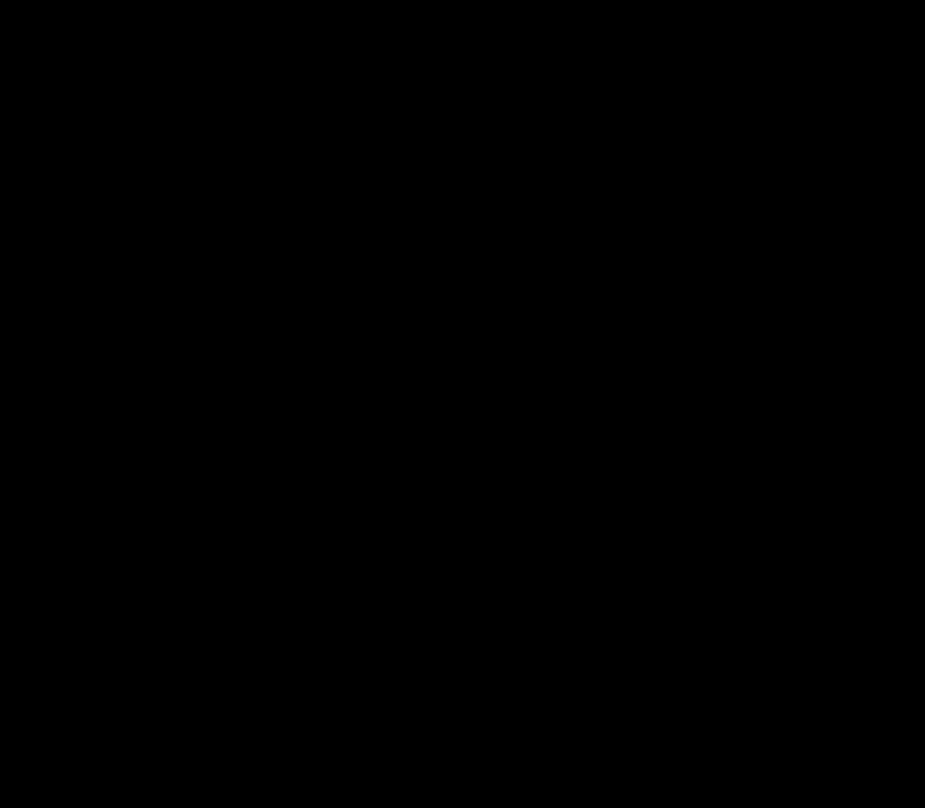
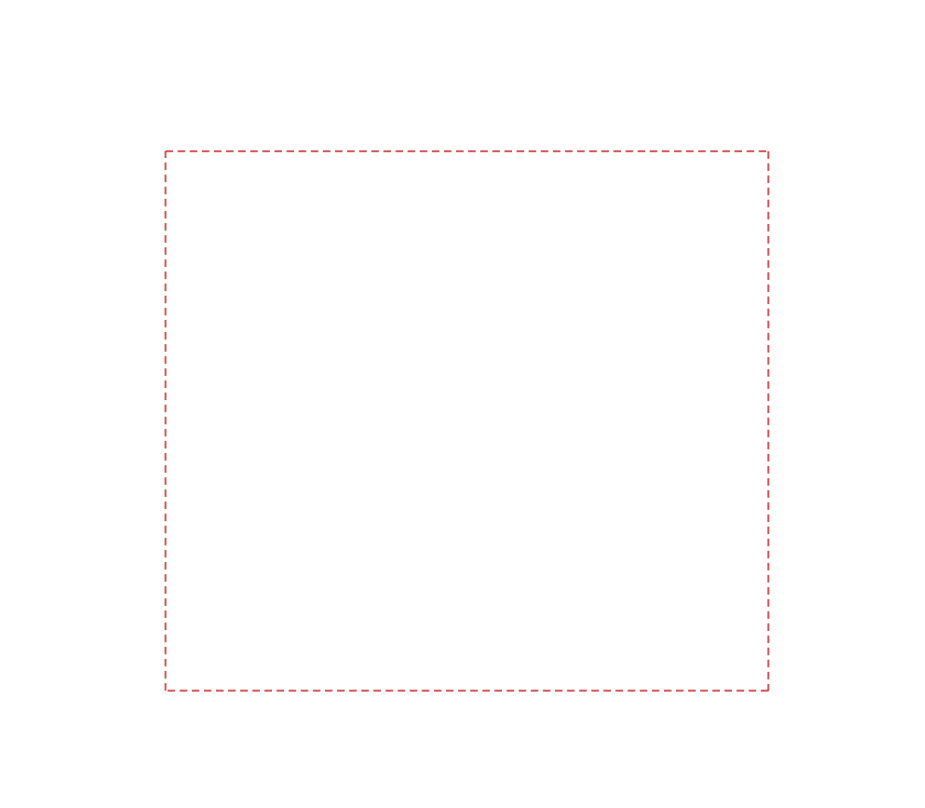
zone outline: none -> (165, 151) (768, 151) (768, 690) (165, 690) (165, 151)

